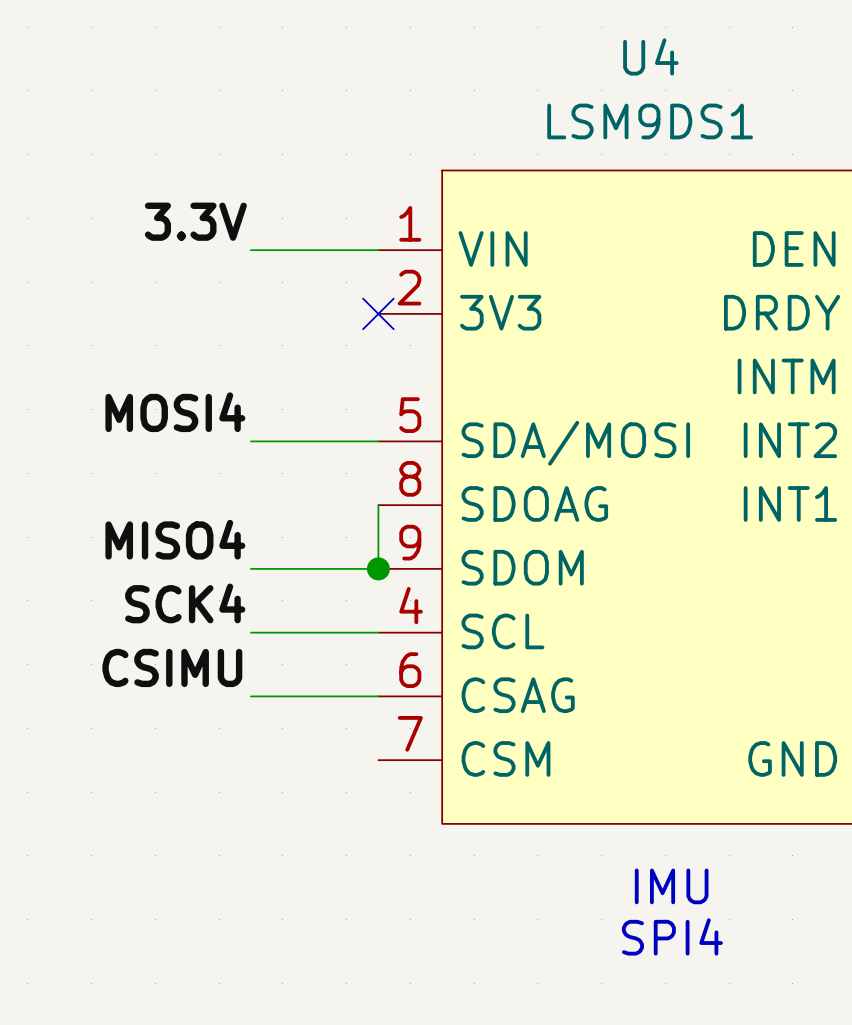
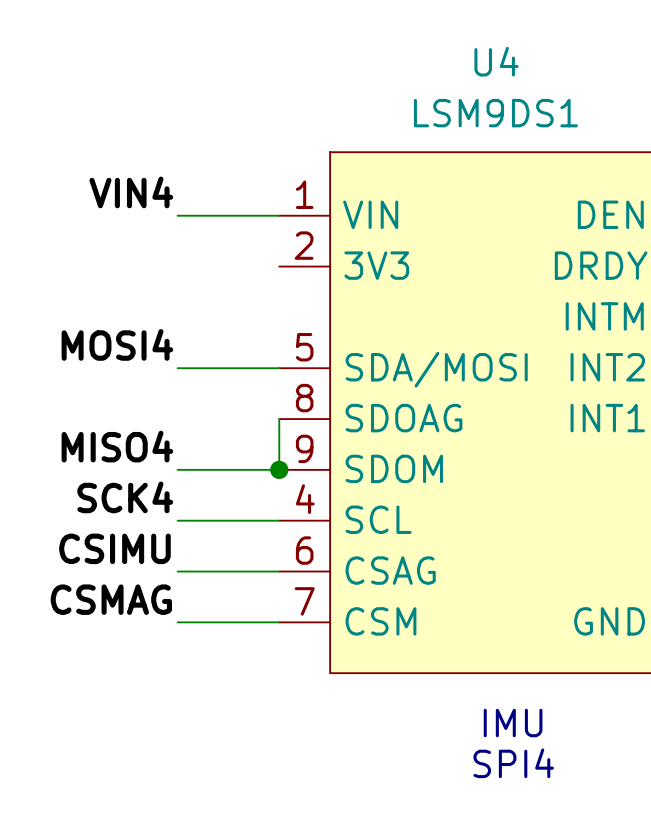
label: 3.3V (195, 221) -> VIN4 (131, 192)
no-connect mark: (378, 313) -> none
label: none -> CSMAG (111, 599)
wire: none -> (177, 622) (279, 622)

